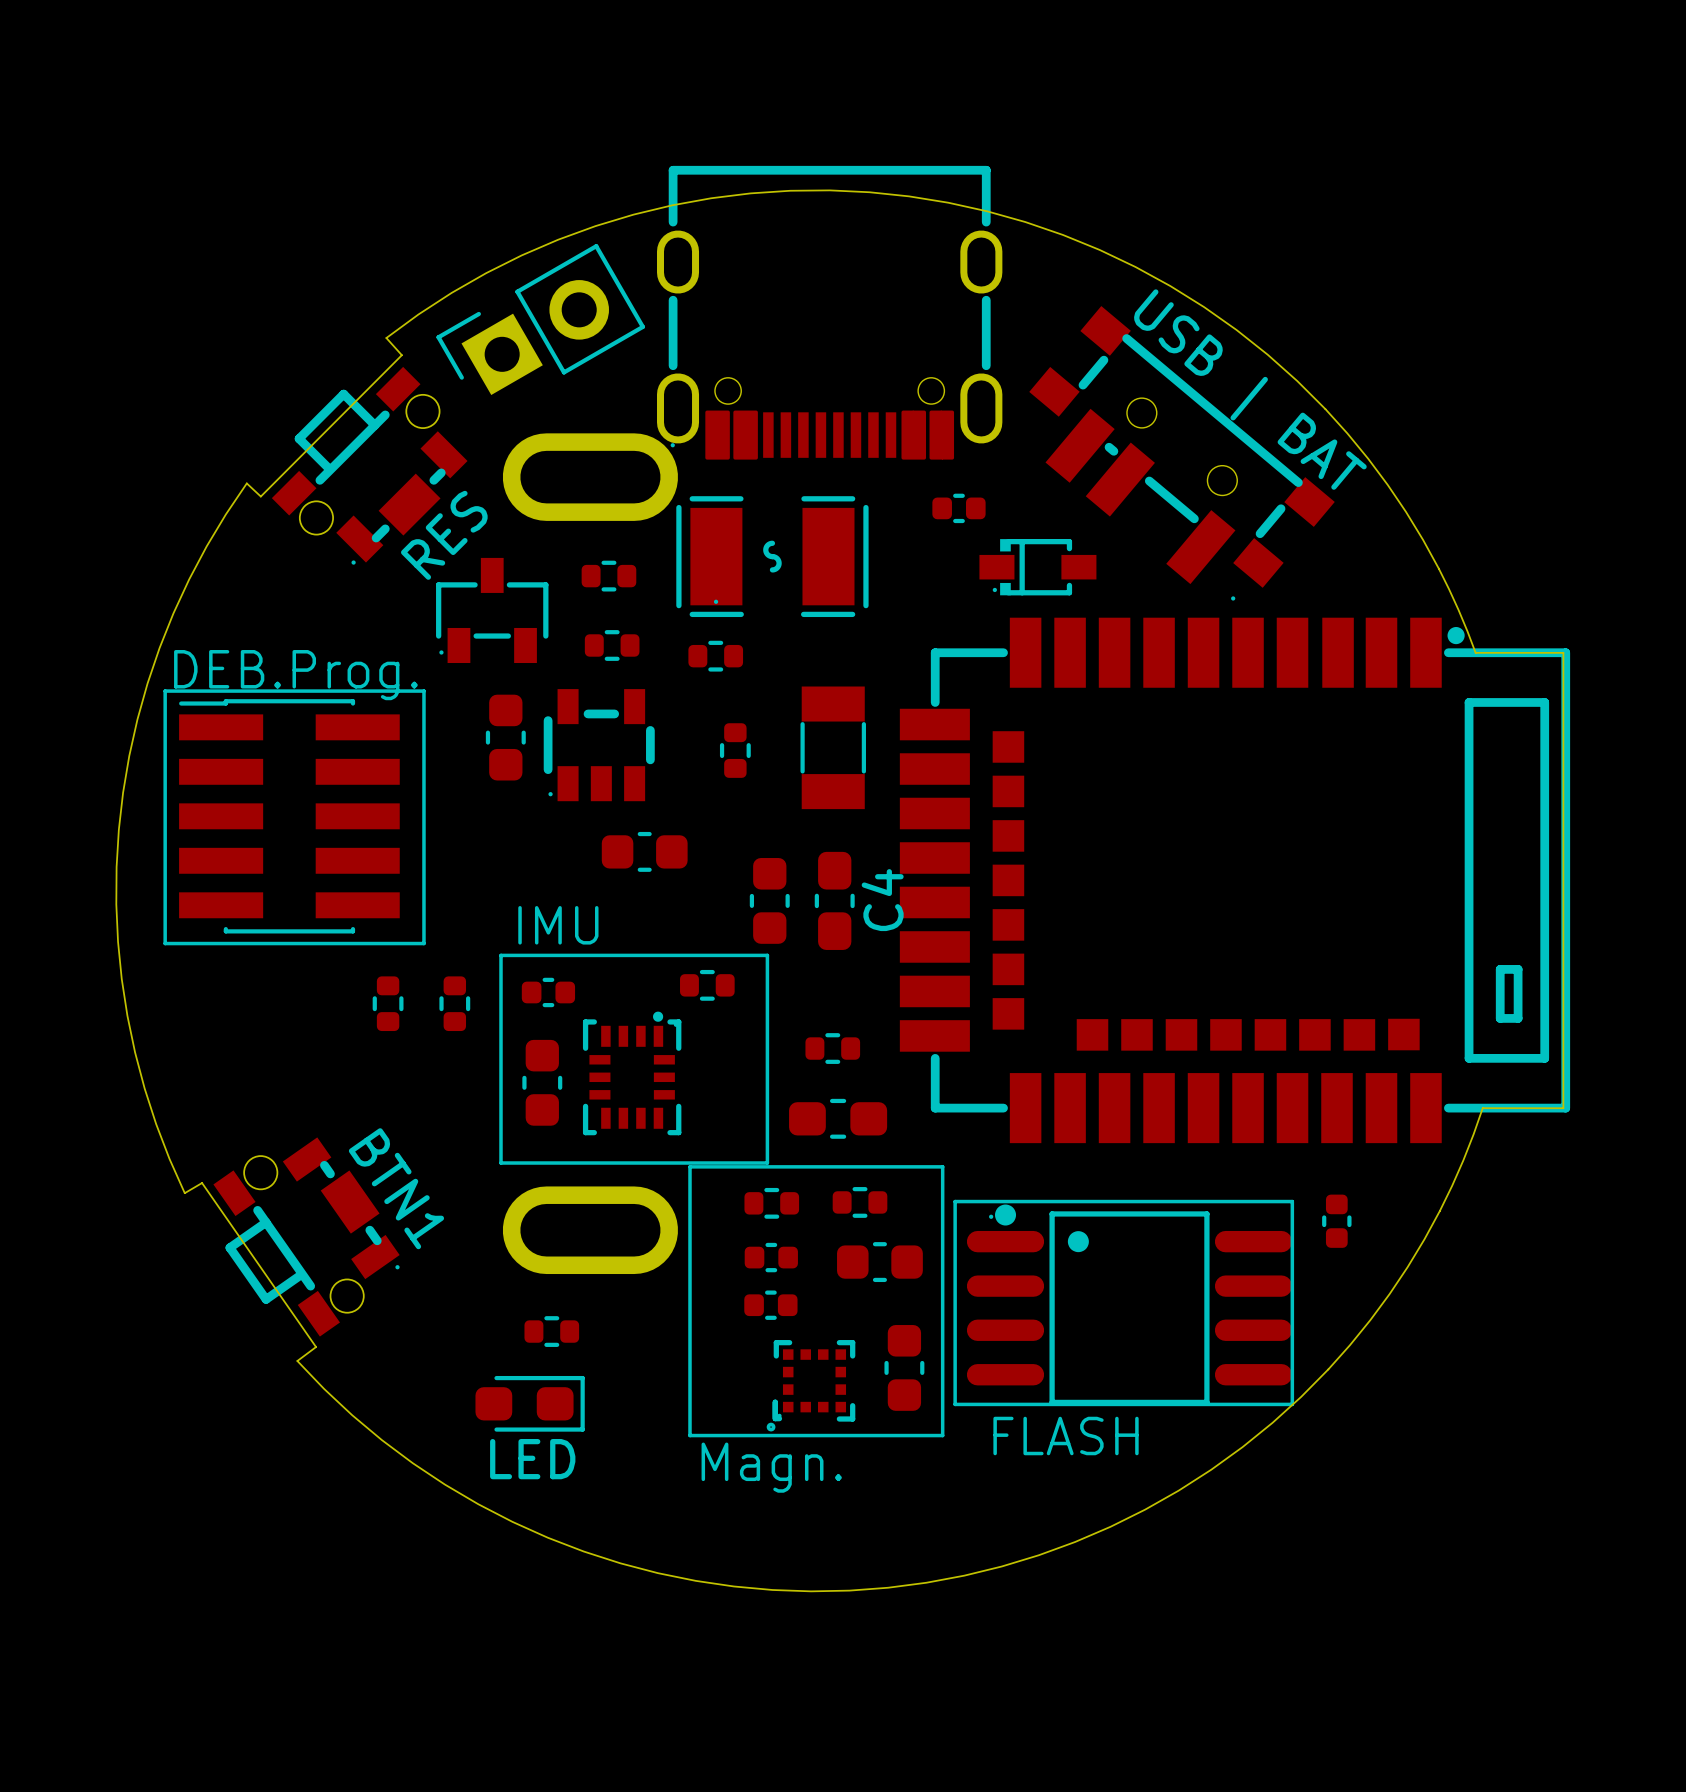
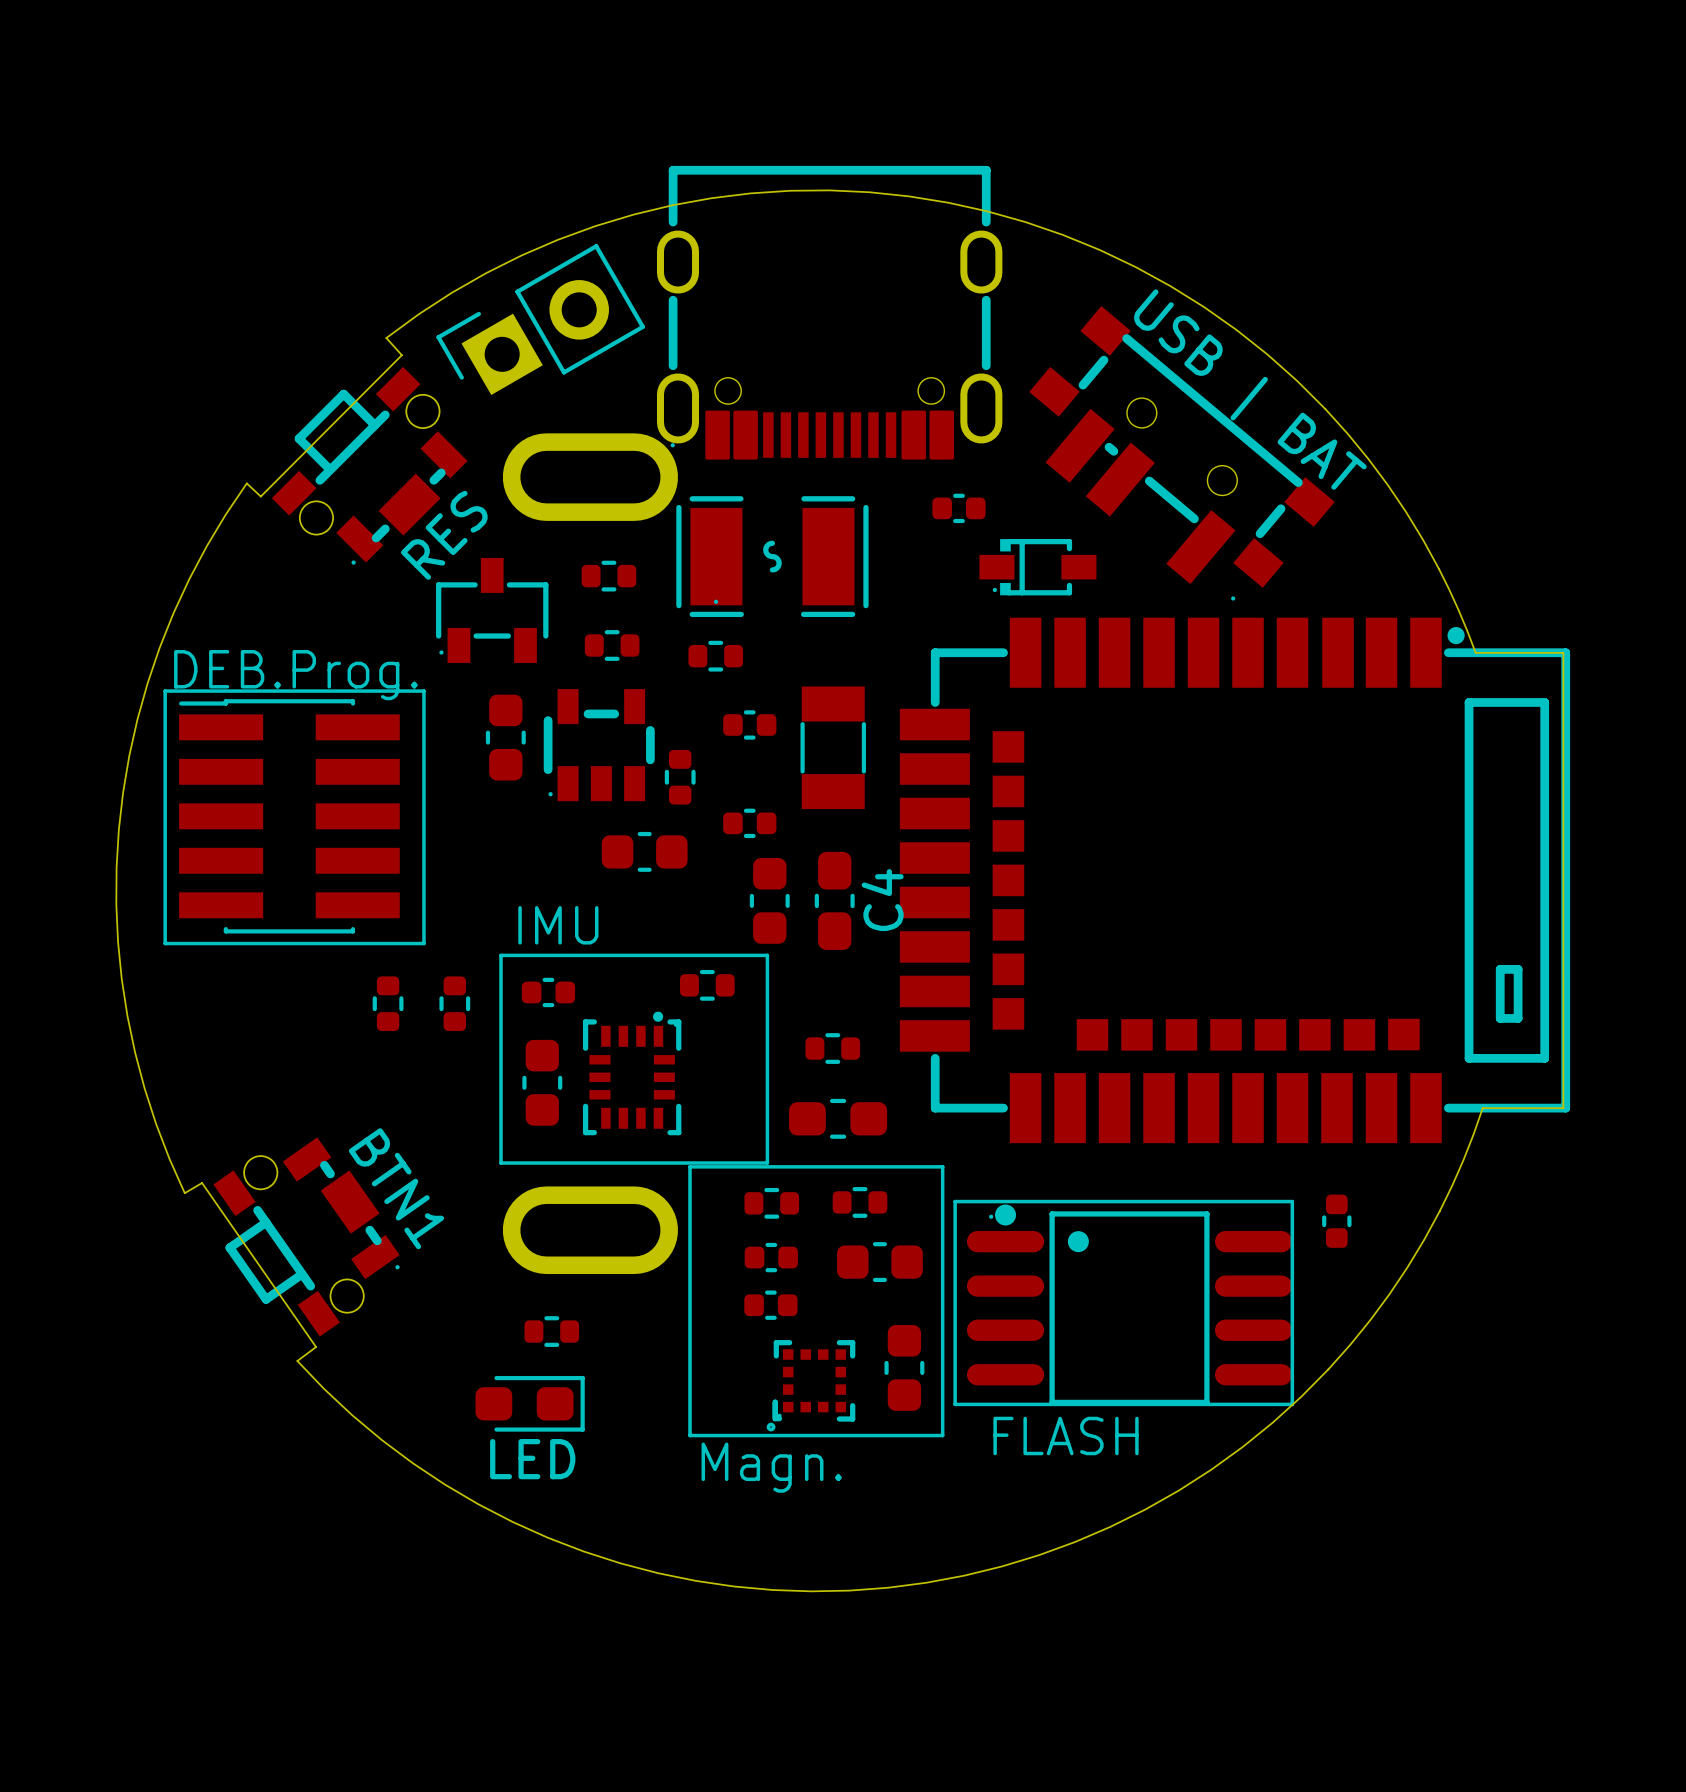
part footprint: [719, 723, 751, 778] -> [723, 710, 777, 740]
part: none -> (680, 777)
part: none -> (749, 823)

